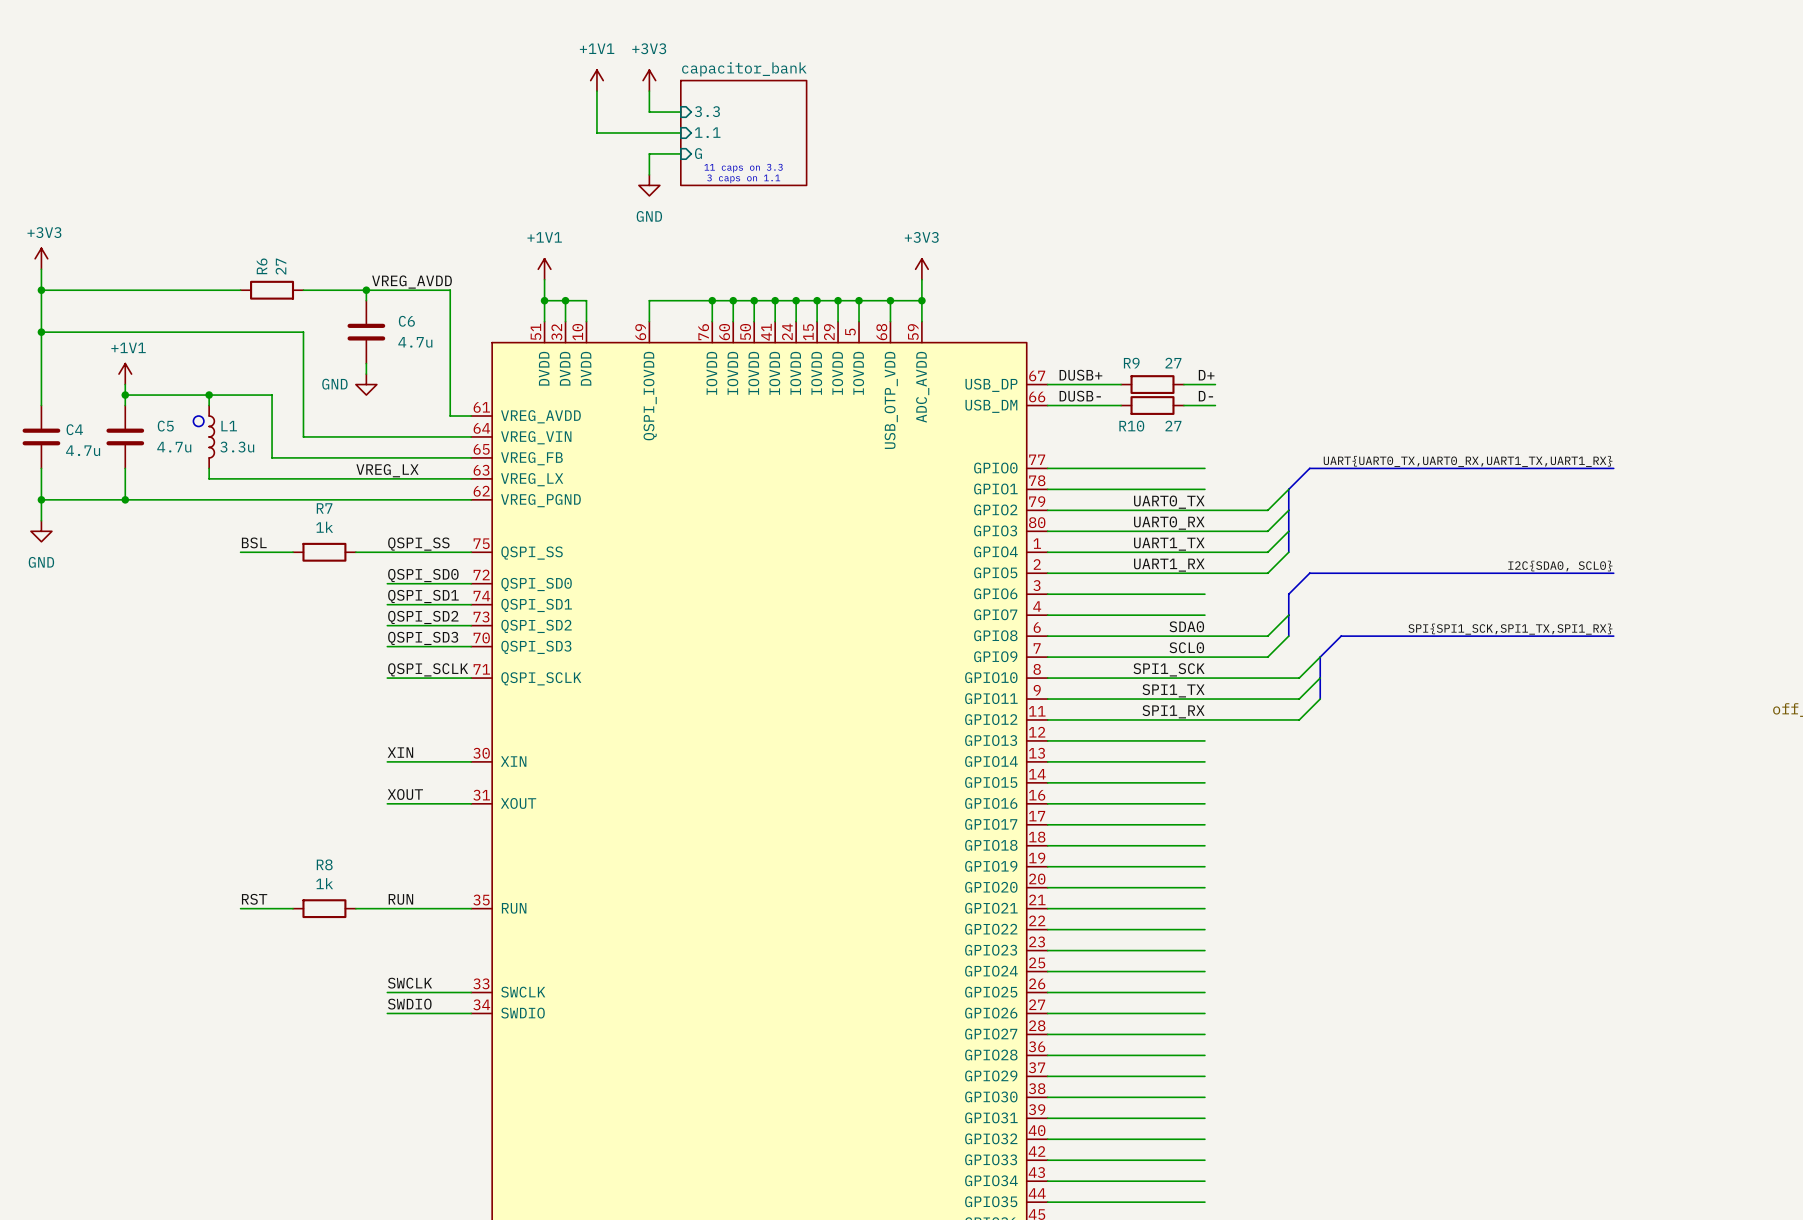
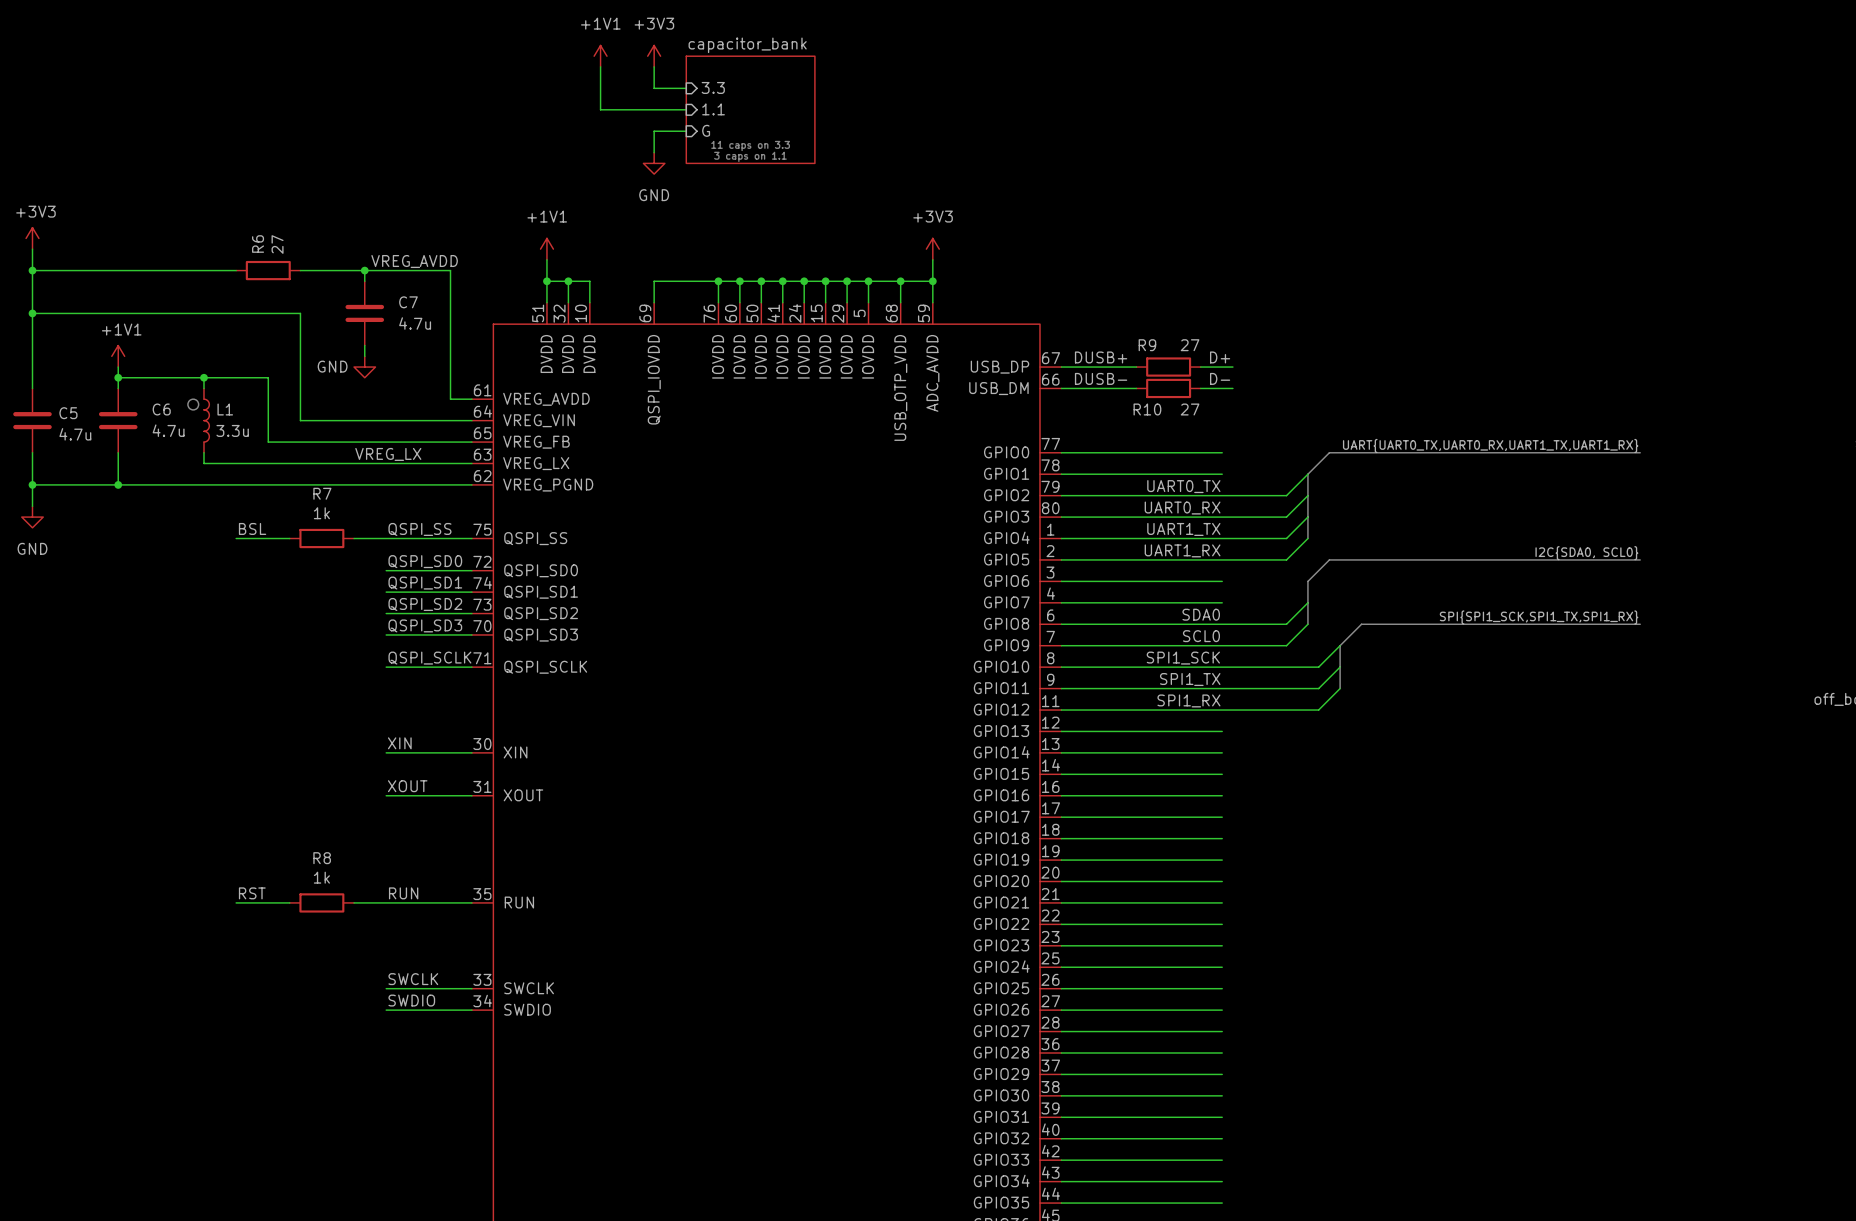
C6 name: C6 (406, 321) -> C7 (408, 302)
C5 name: C5 (165, 426) -> C6 (161, 409)
C4 name: C4 (74, 429) -> C5 (68, 413)

